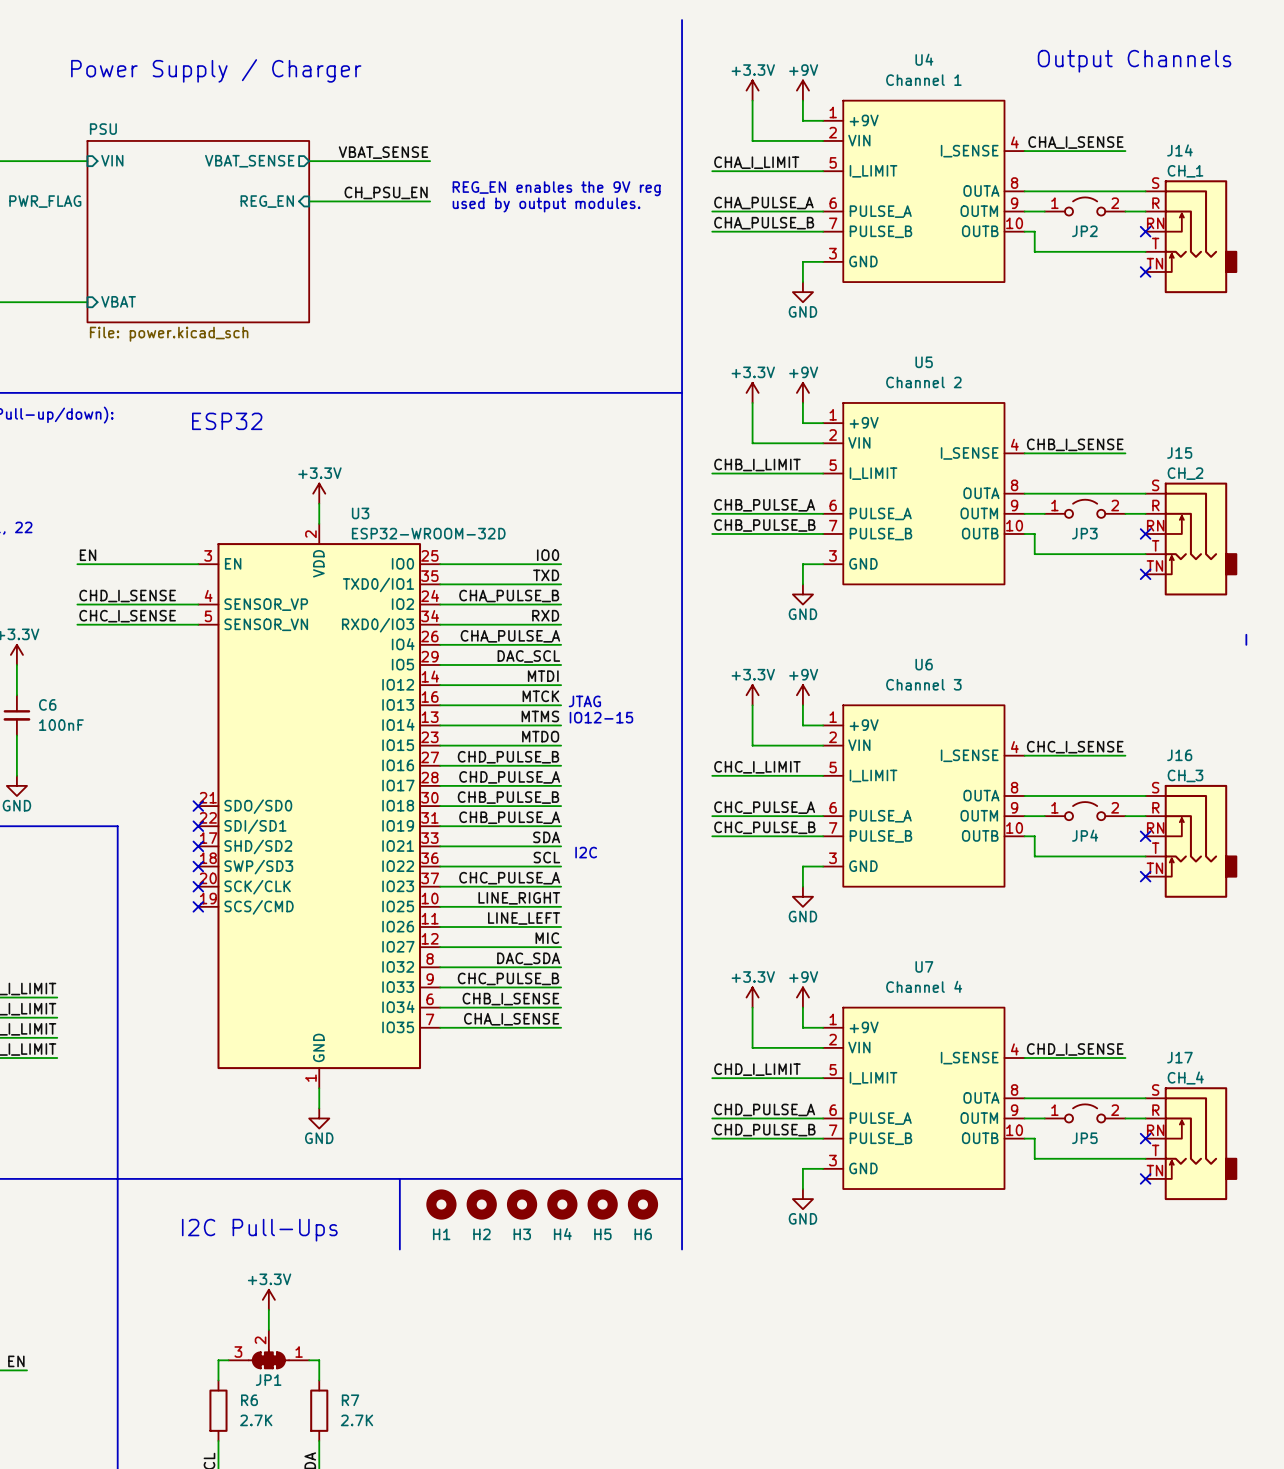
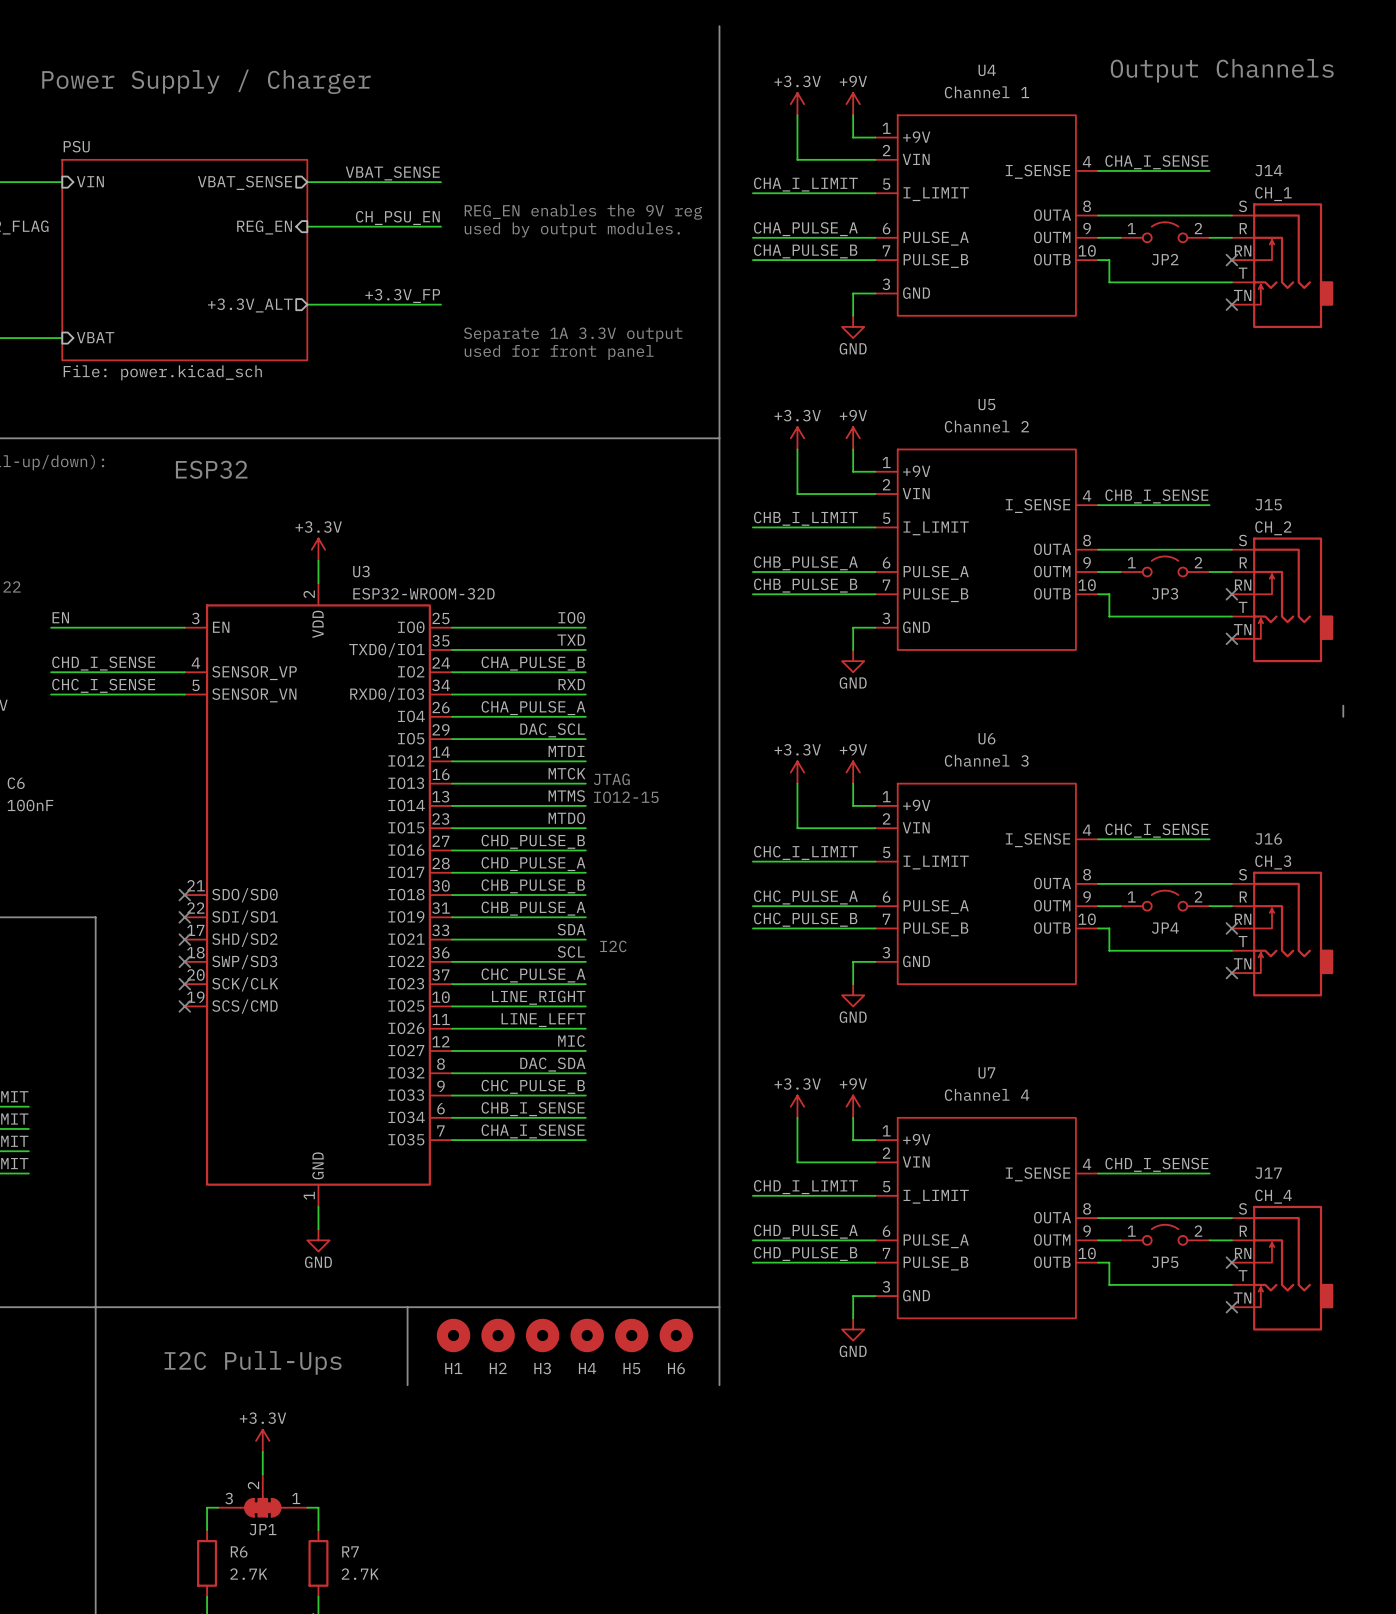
label: none -> +3.3V_FP (402, 295)
wire: none -> (307, 304) (441, 304)
sheet pin: none -> +3.3V_ALT (250, 305)
text: none -> Separate 1A 3.3V output (573, 334)
text: none -> used for front panel (559, 352)

